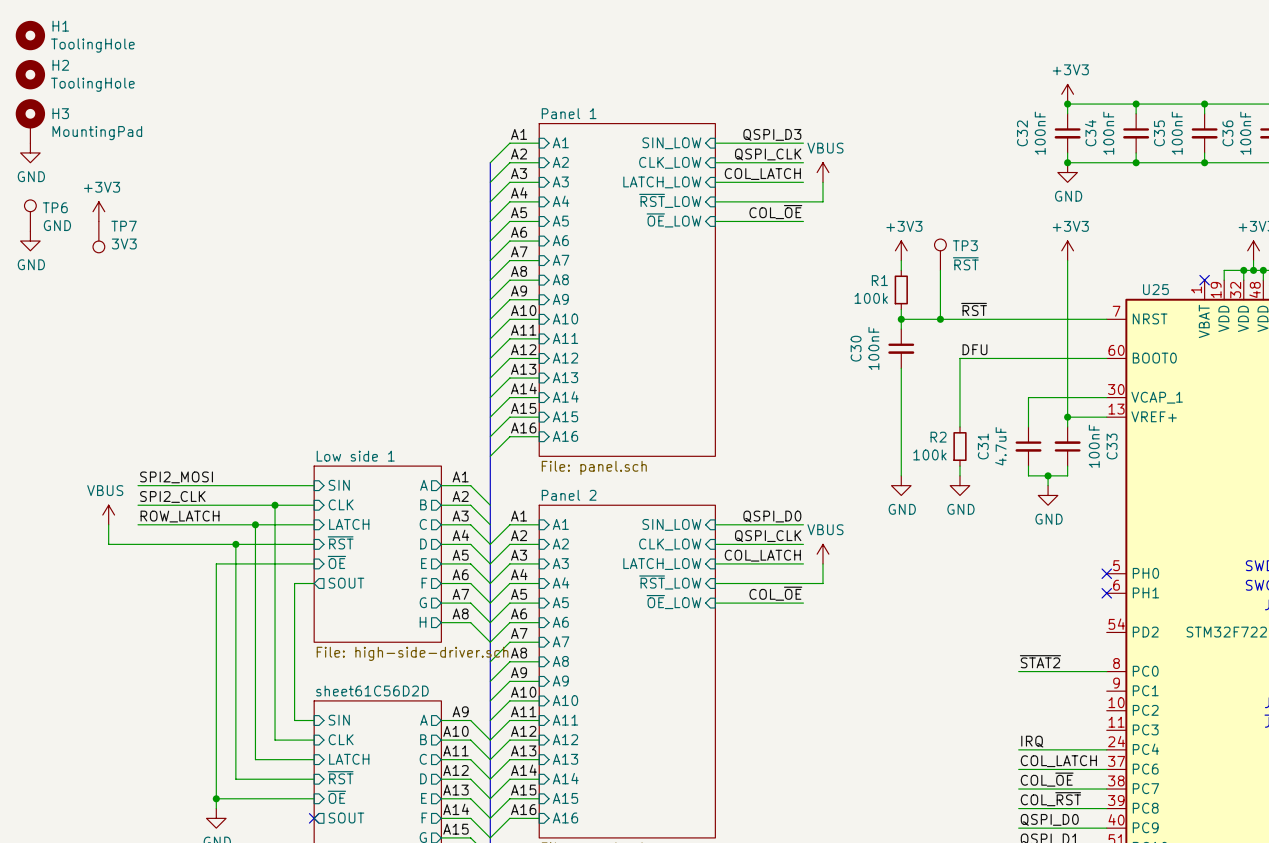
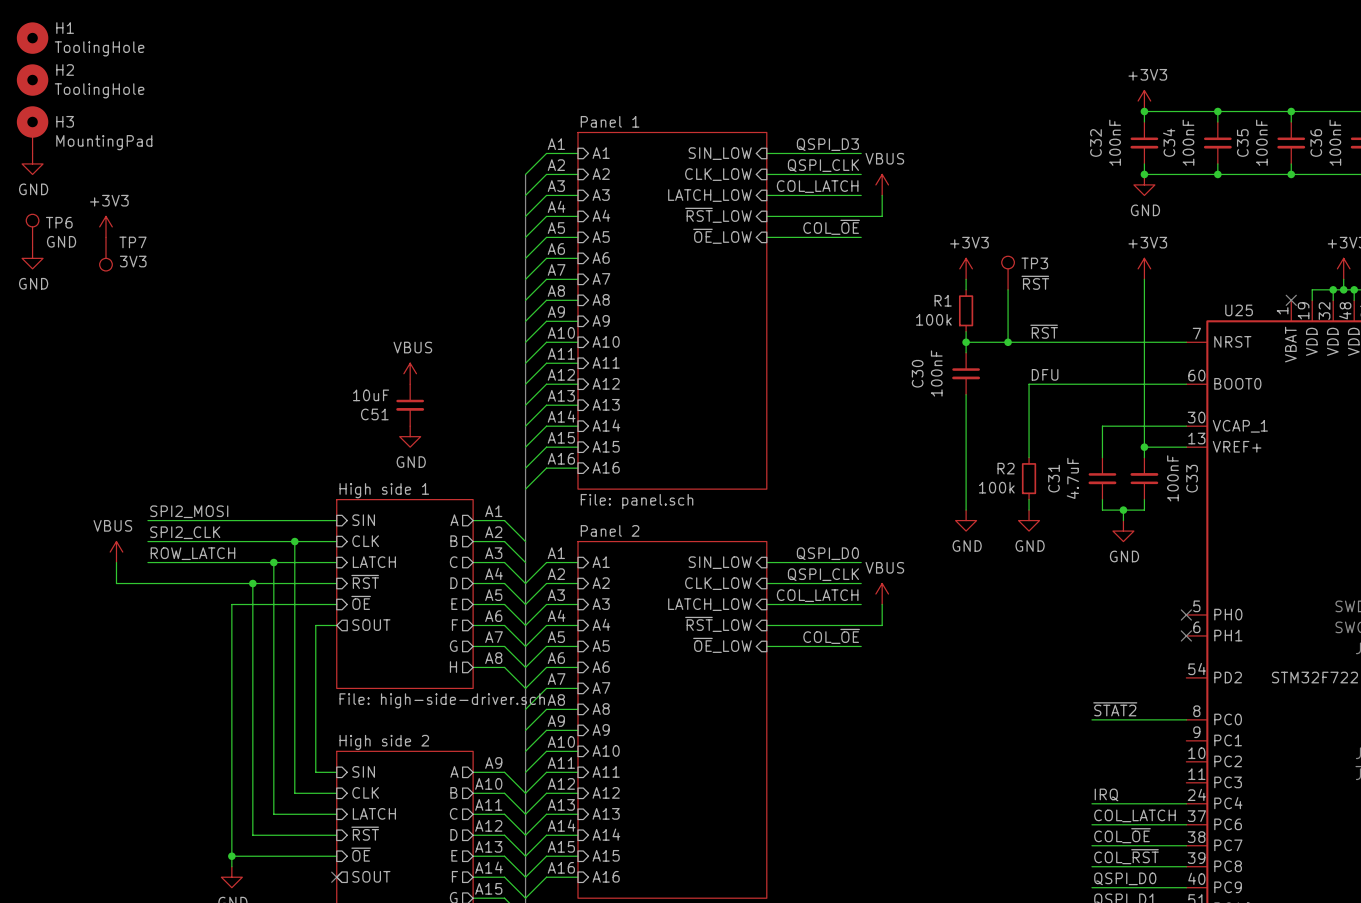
power symbol: none -> VBUS (410, 373)
C51: none -> 10uF (410, 405)
power symbol: none -> GND (410, 436)
sheet Low side 1 name: Low side 1 (355, 456) -> High side 1 (384, 490)
sheet sheet61C56D2D name: sheet61C56D2D (372, 690) -> High side 2 (384, 742)

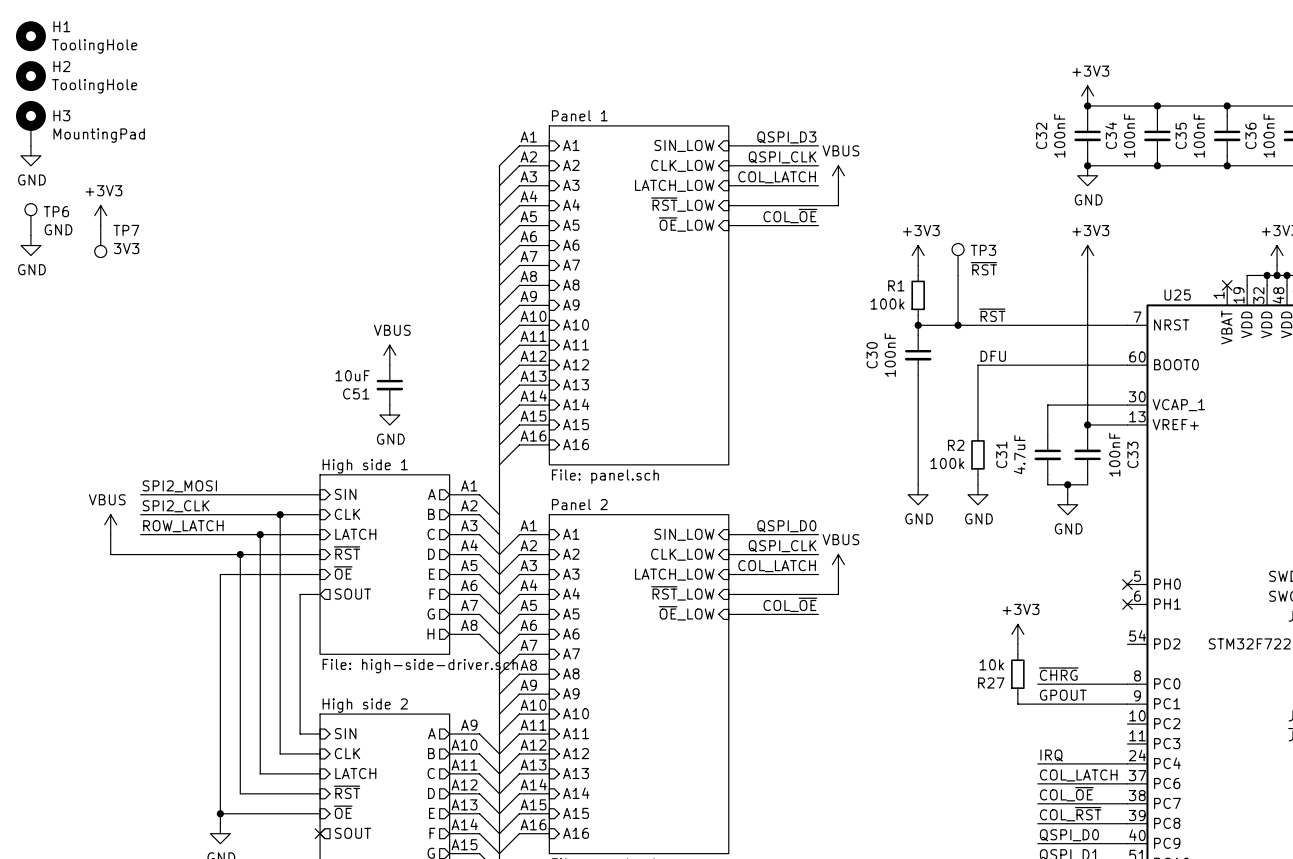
power symbol: none -> +3V3 (1017, 634)
wire: none -> (1017, 644) (1017, 654)
R27: none -> 10k (1017, 674)
label: ~{STAT2} (1115, 709) -> ~{CHRG} (1058, 674)
wire: none -> (1017, 694) (1017, 704) (1127, 704)
label: none -> GPOUT (1063, 695)

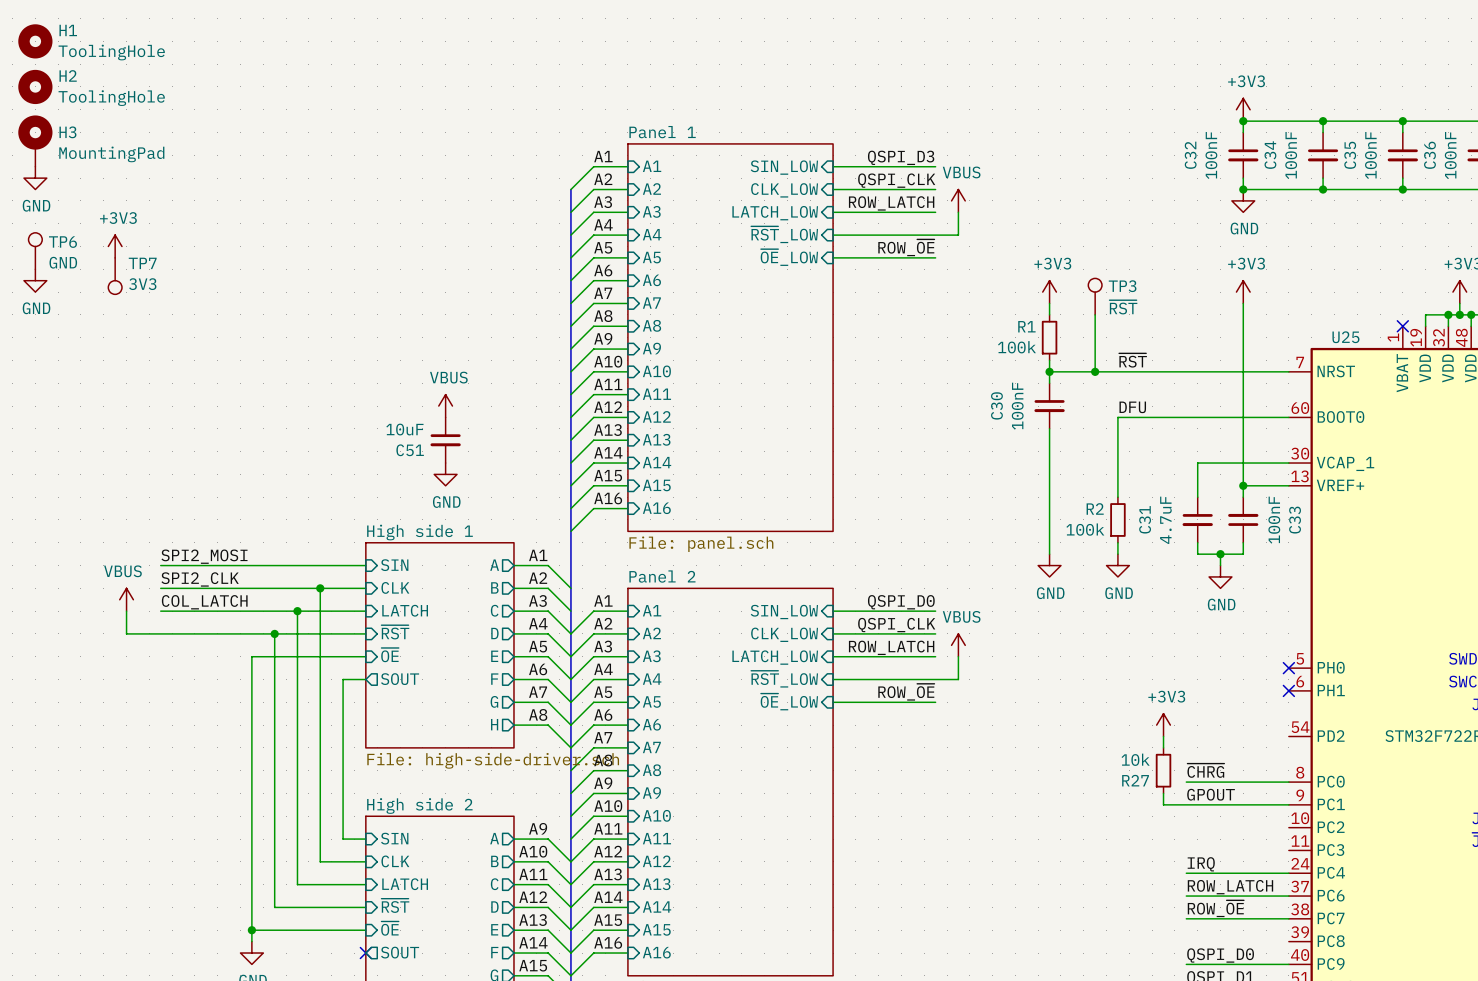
label: COL_LATCH (777, 177) -> ROW_LATCH (891, 203)
label: COL_~{OE} (790, 216) -> ROW_~{OE} (906, 247)
label: ROW_LATCH (183, 526) -> COL_LATCH (204, 602)
label: COL_LATCH (777, 566) -> ROW_LATCH (891, 647)
label: COL_~{OE} (790, 604) -> ROW_~{OE} (906, 692)
label: COL_LATCH (1078, 775) -> ROW_LATCH (1230, 887)
label: COL_~{OE} (1066, 794) -> ROW_~{OE} (1215, 908)
label: COL_~{RST} (1070, 814) -> none
wire: (1037, 823) (1127, 823) -> none

